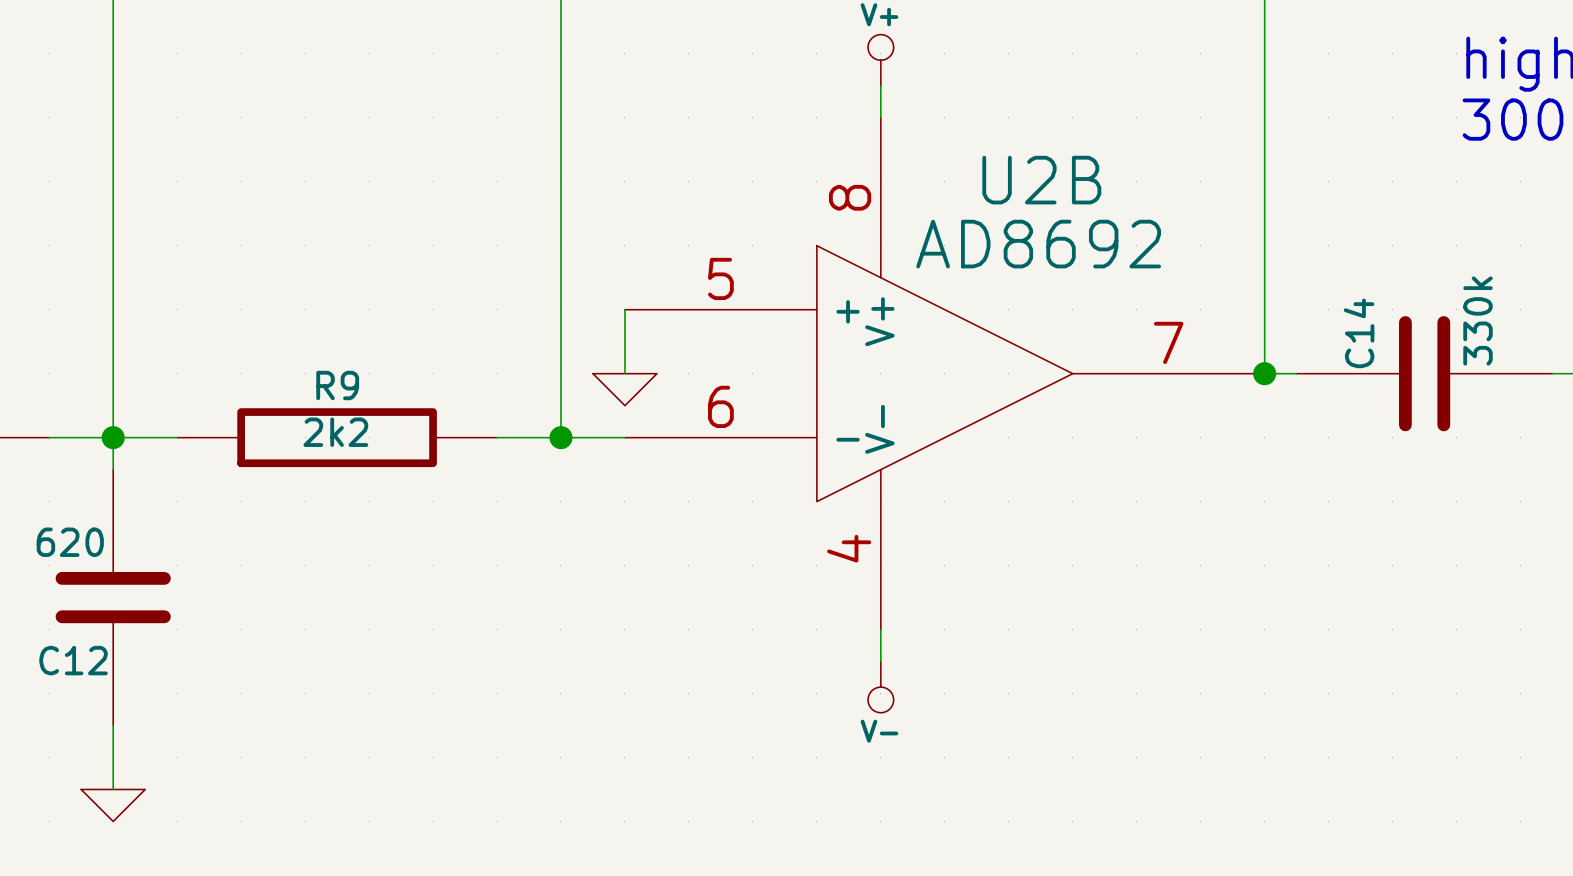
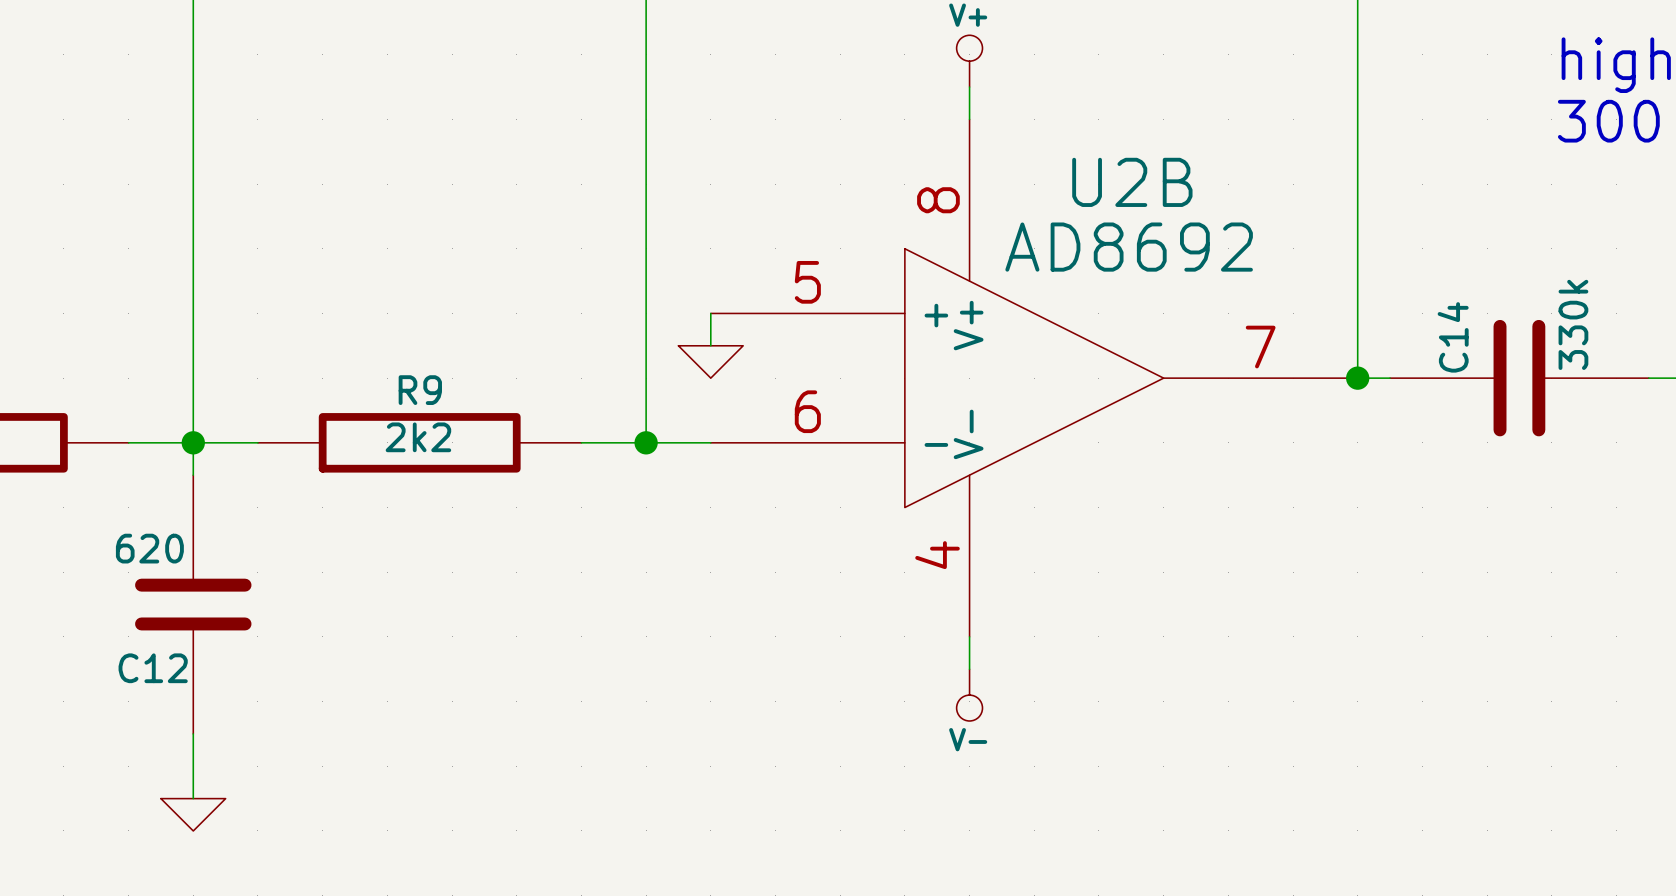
wire: (624, 341) (624, 373) -> none
power symbol position: (624, 389) -> (710, 361)

